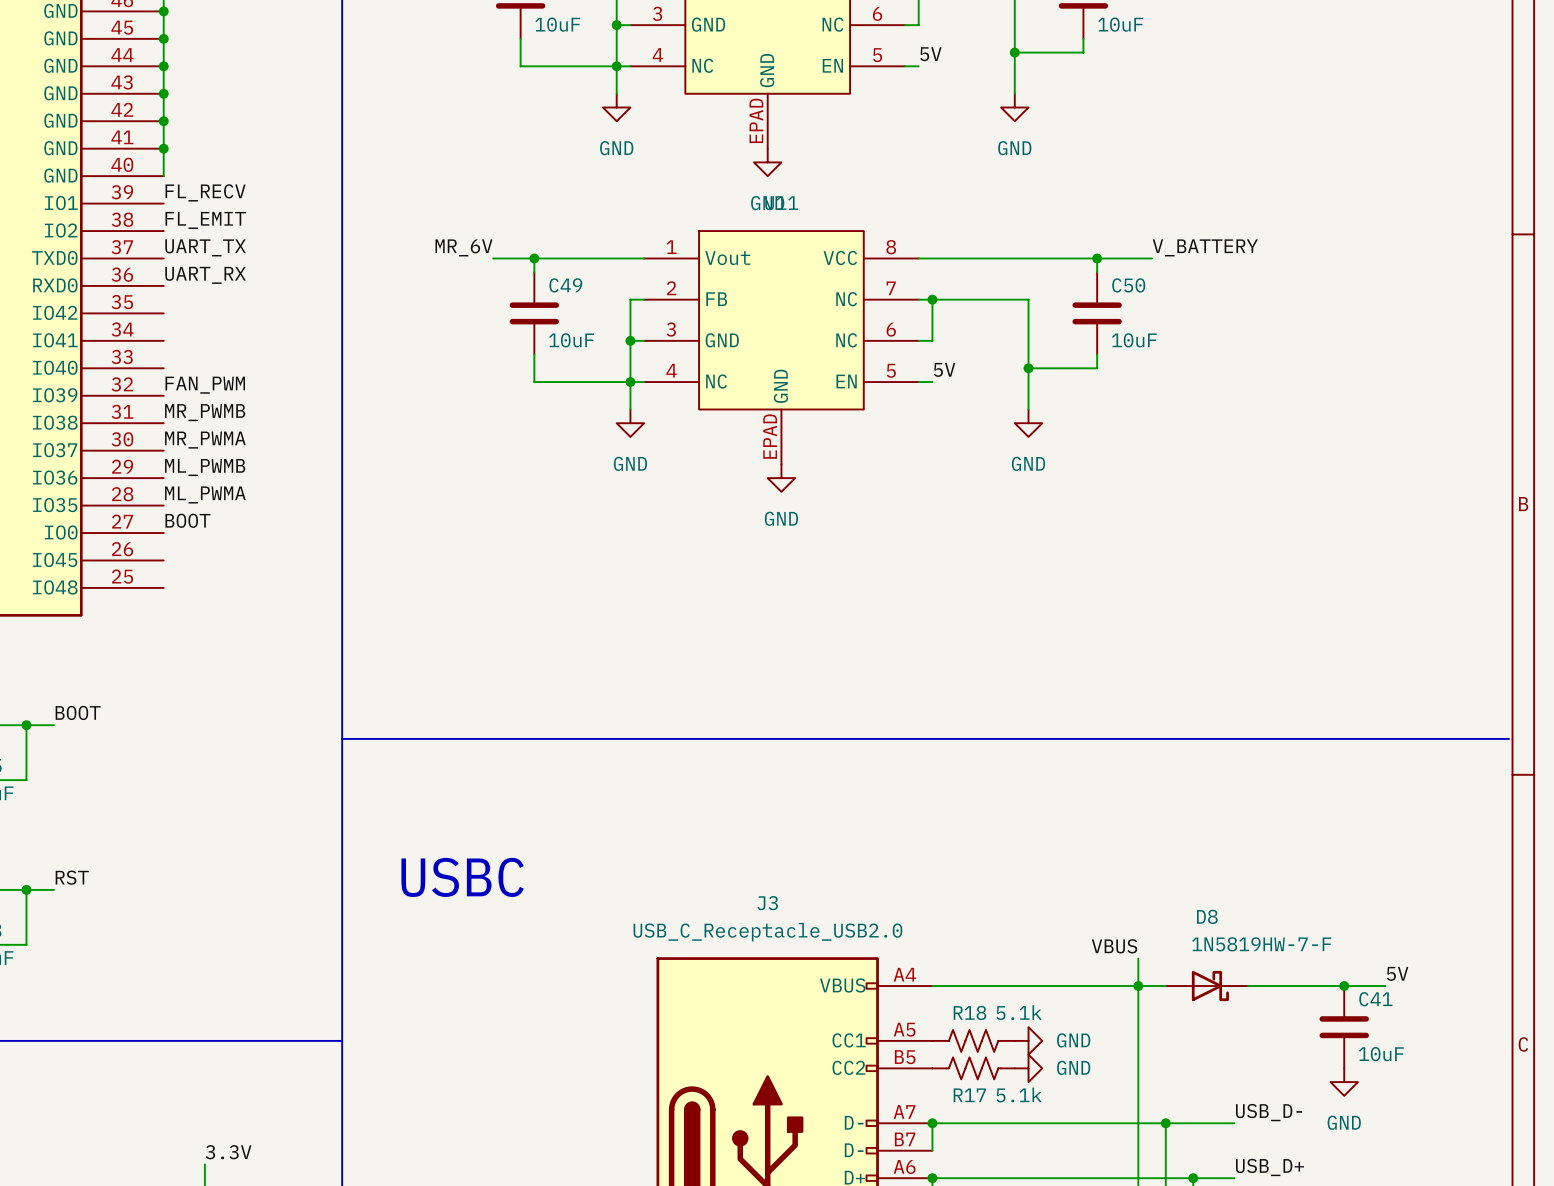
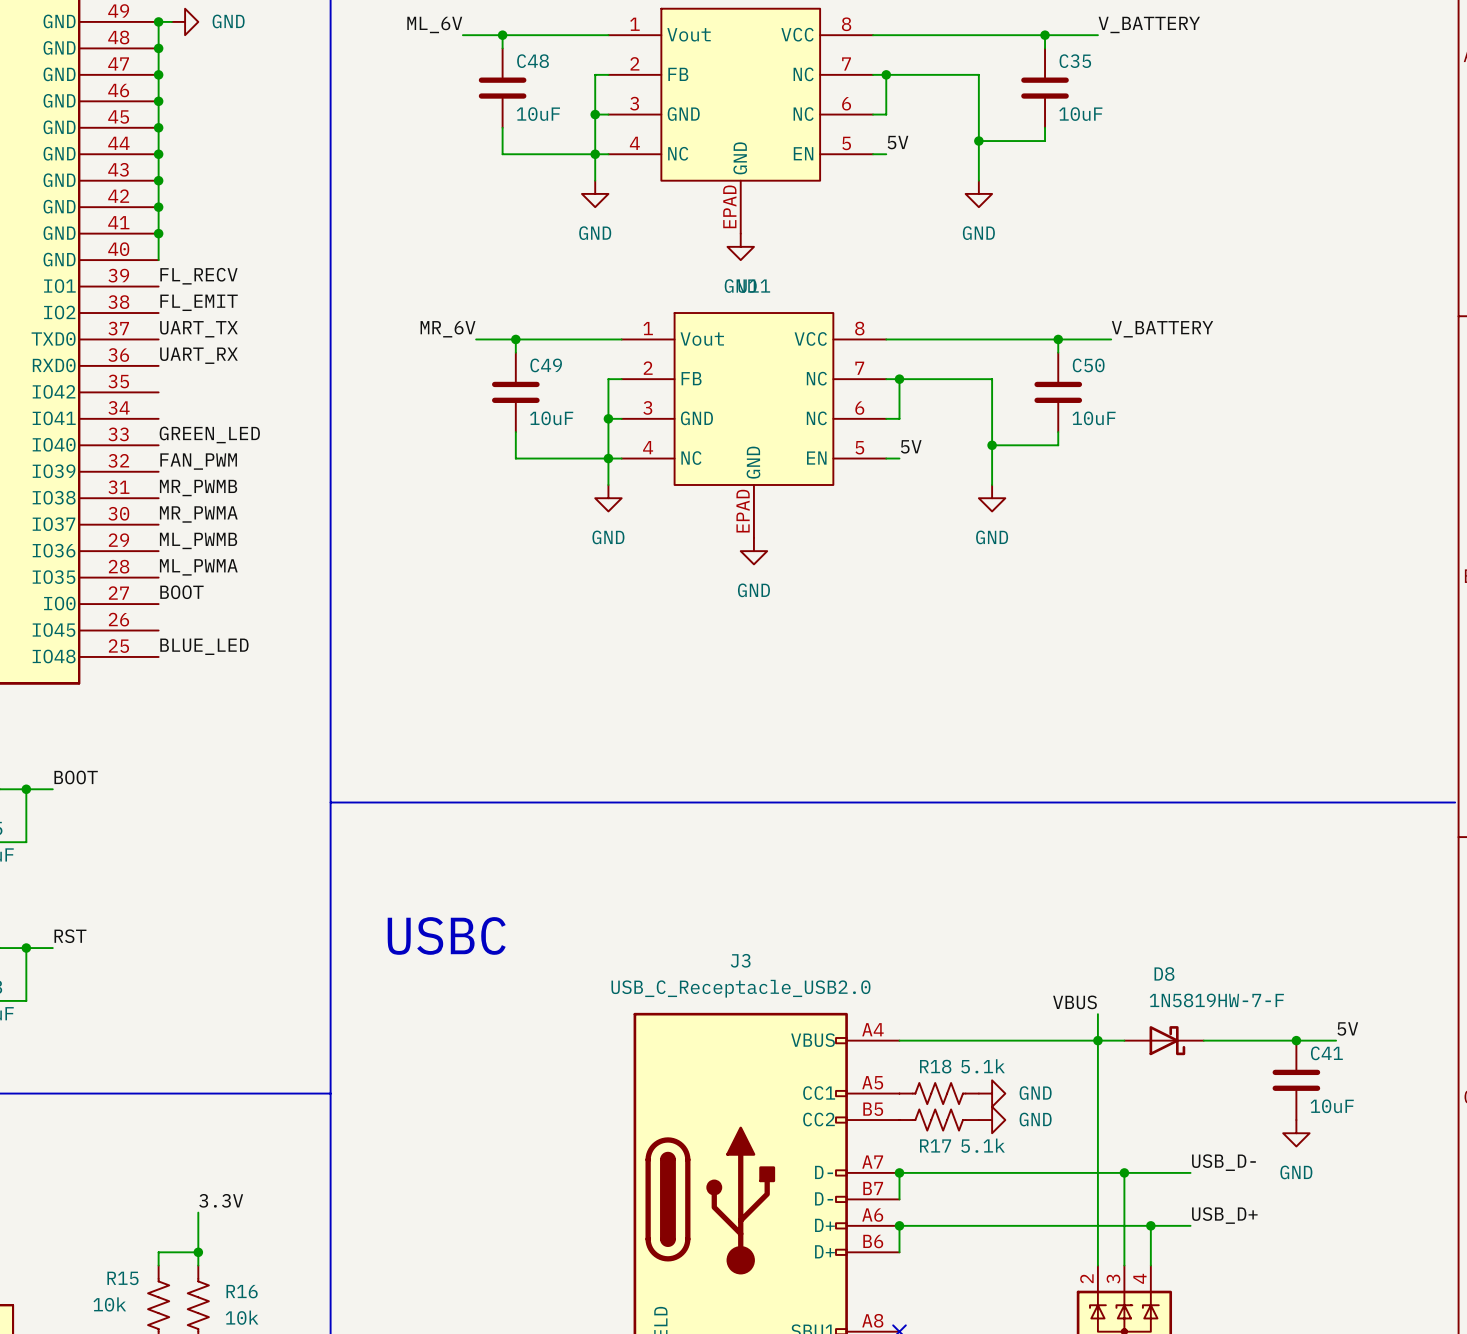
label: none -> GREEN_LED (209, 434)
label: none -> BLUE_LED (204, 646)

